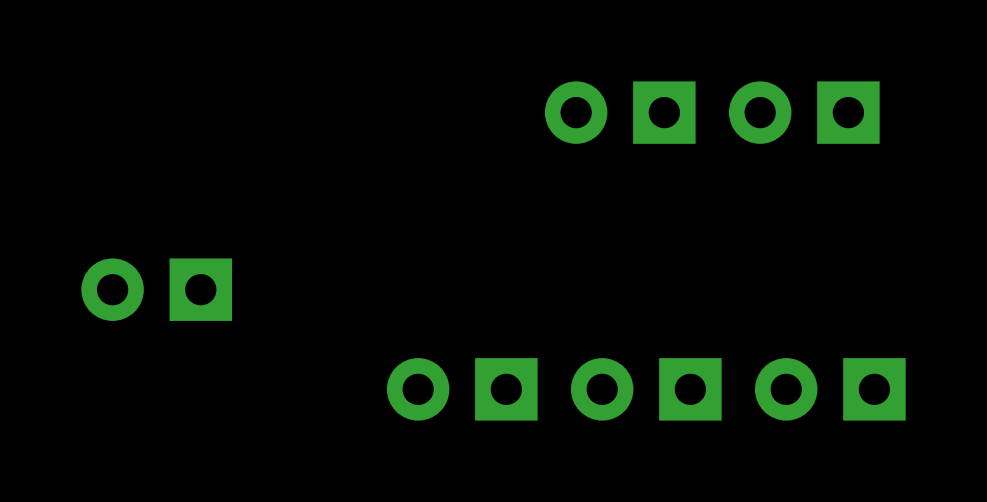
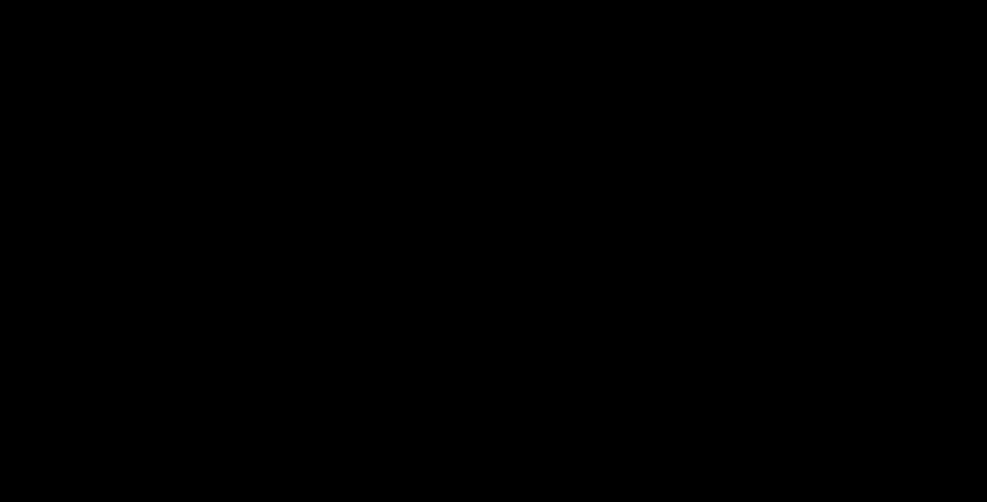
part: (620, 112) -> none
part: (804, 112) -> none
part: (156, 289) -> none
part: (462, 389) -> none
part: (646, 389) -> none
part: (830, 389) -> none

